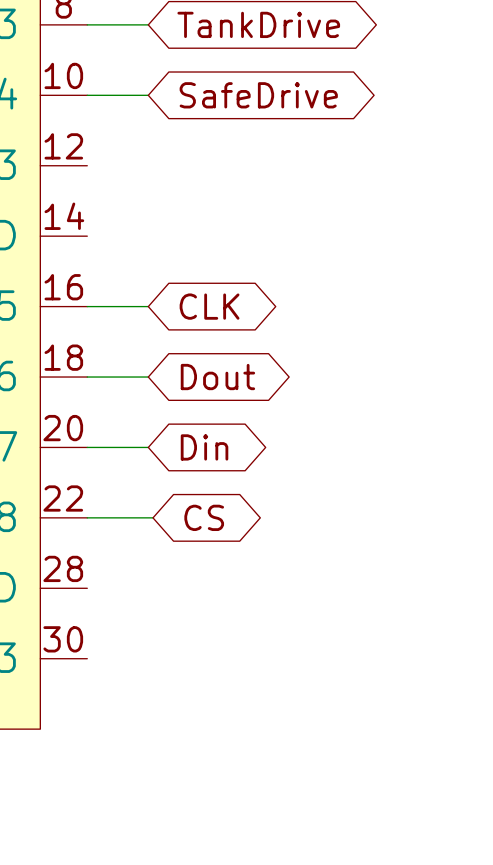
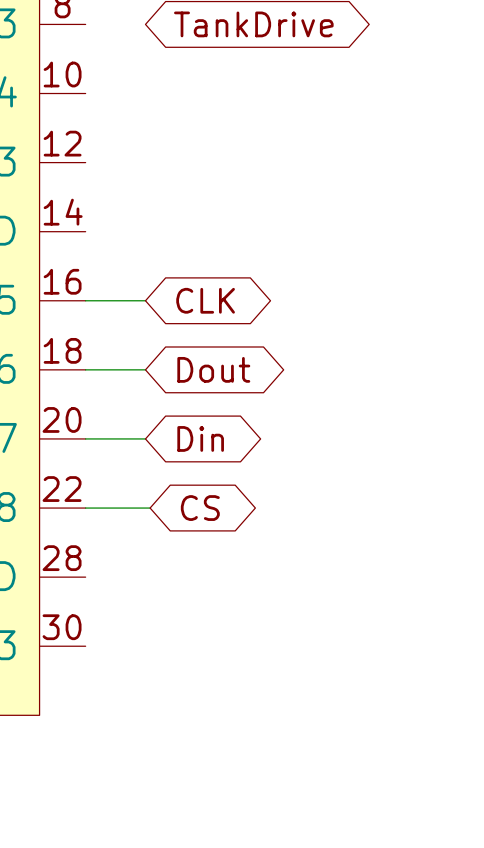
wire: (87, 24) (148, 24) -> none
wire: (87, 95) (148, 95) -> none
global label: SafeDrive (258, 95) -> none

